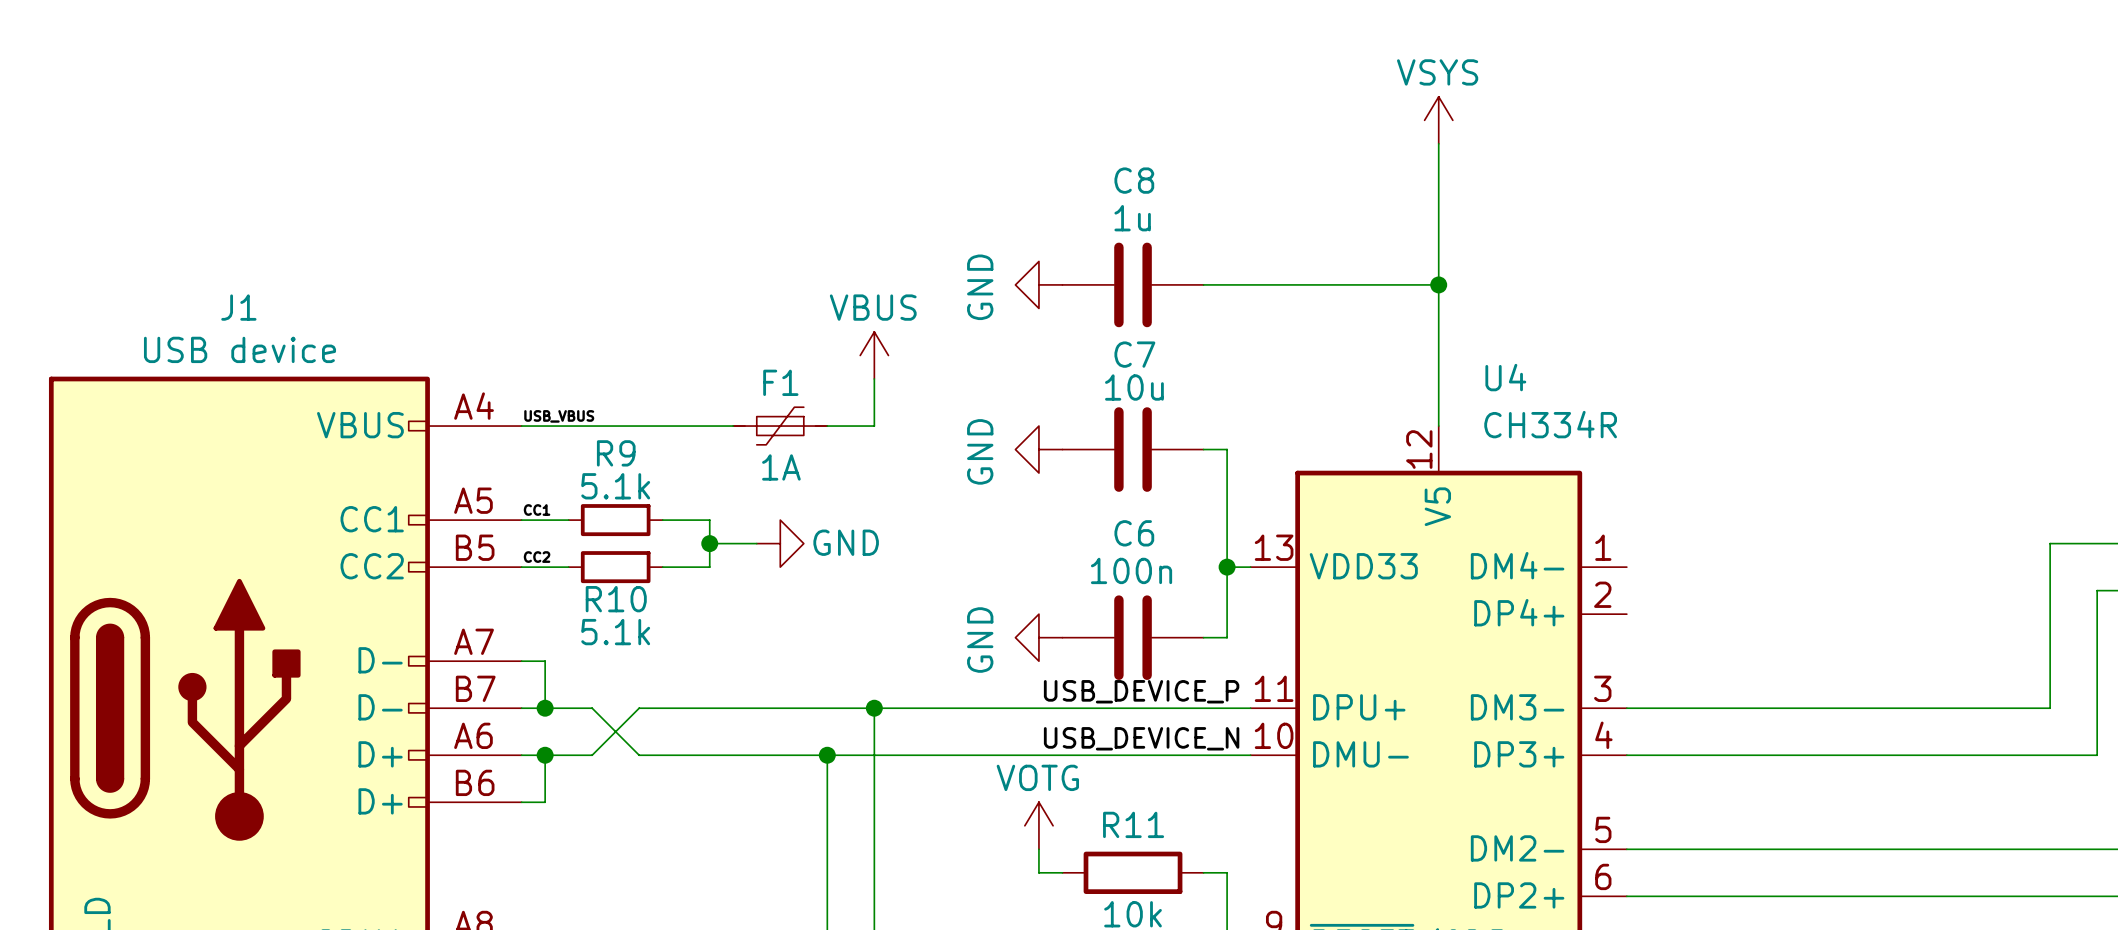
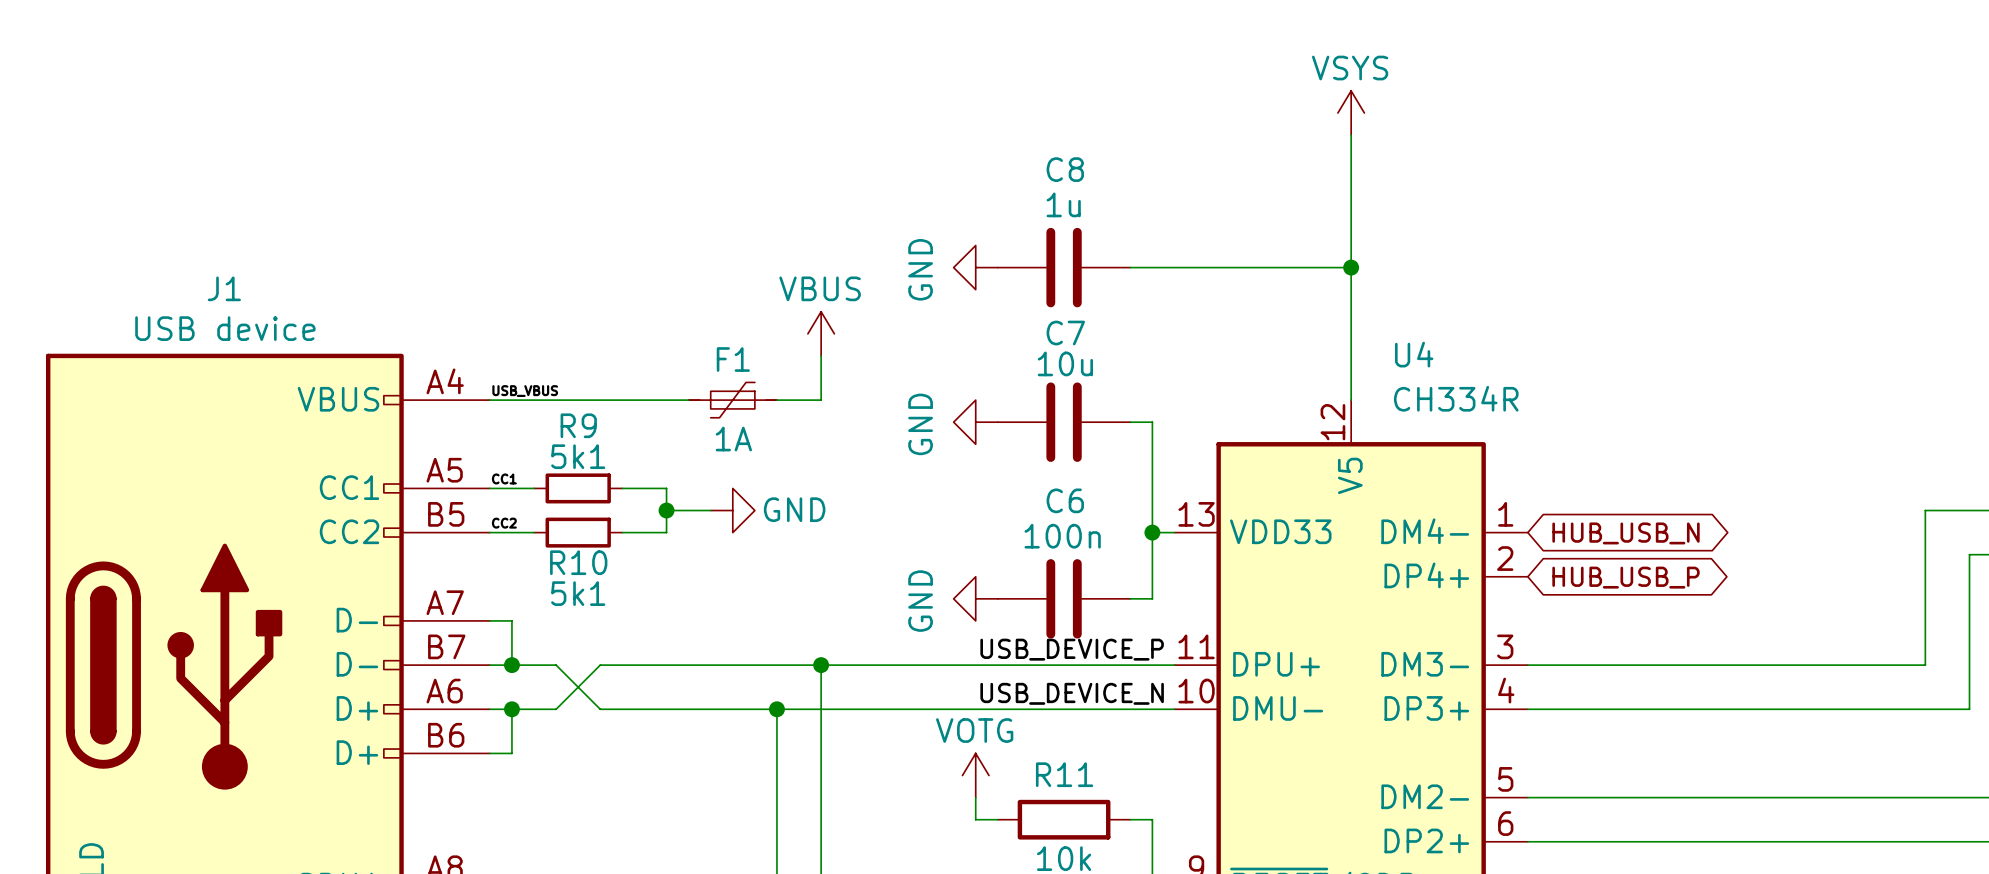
R9 value: 5.1k (615, 486) -> 5k1 (578, 456)
global label: none -> HUB_USB_N (1626, 533)
global label: none -> HUB_USB_P (1626, 577)
R10 value: 5.1k (615, 632) -> 5k1 (578, 593)

